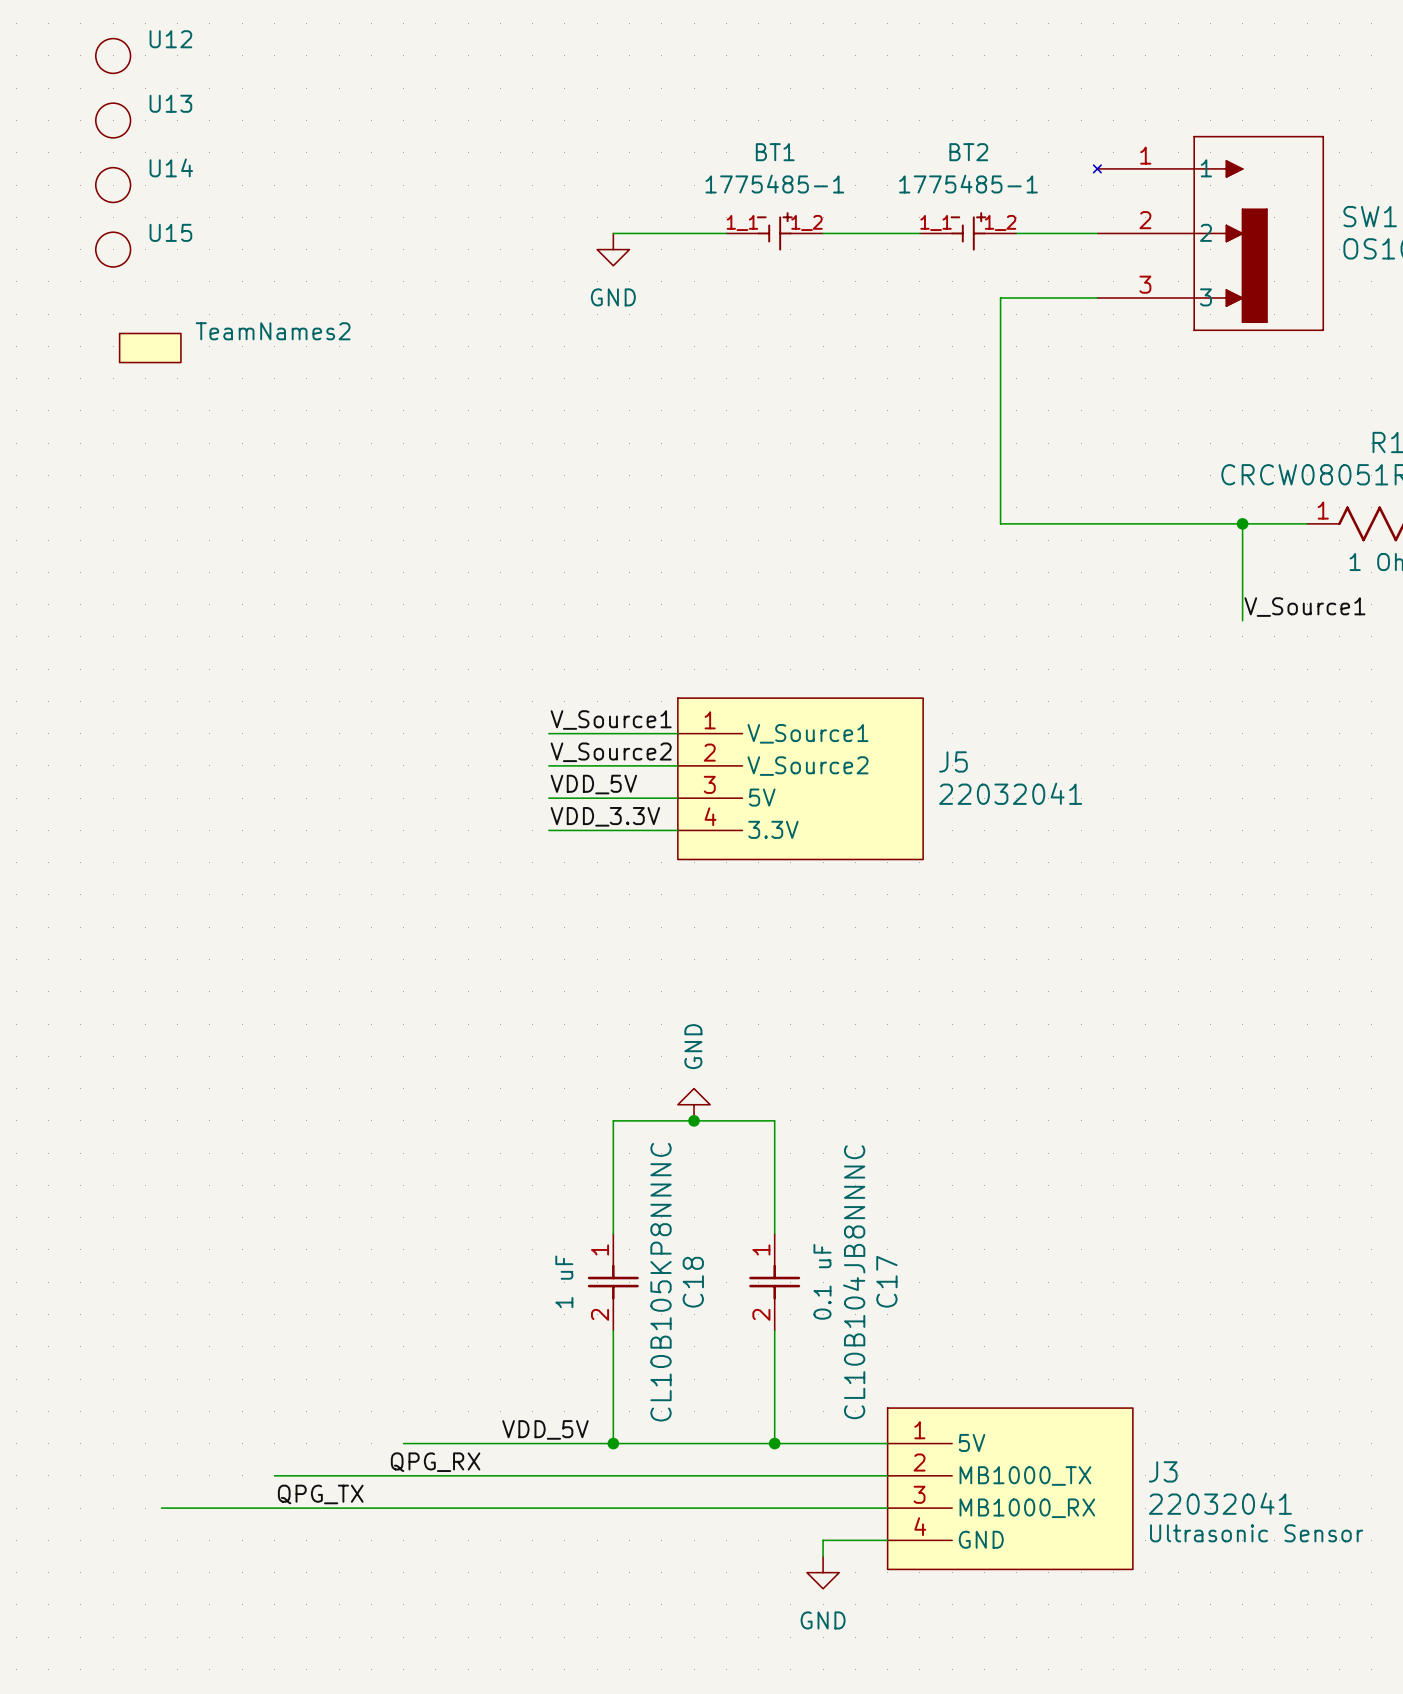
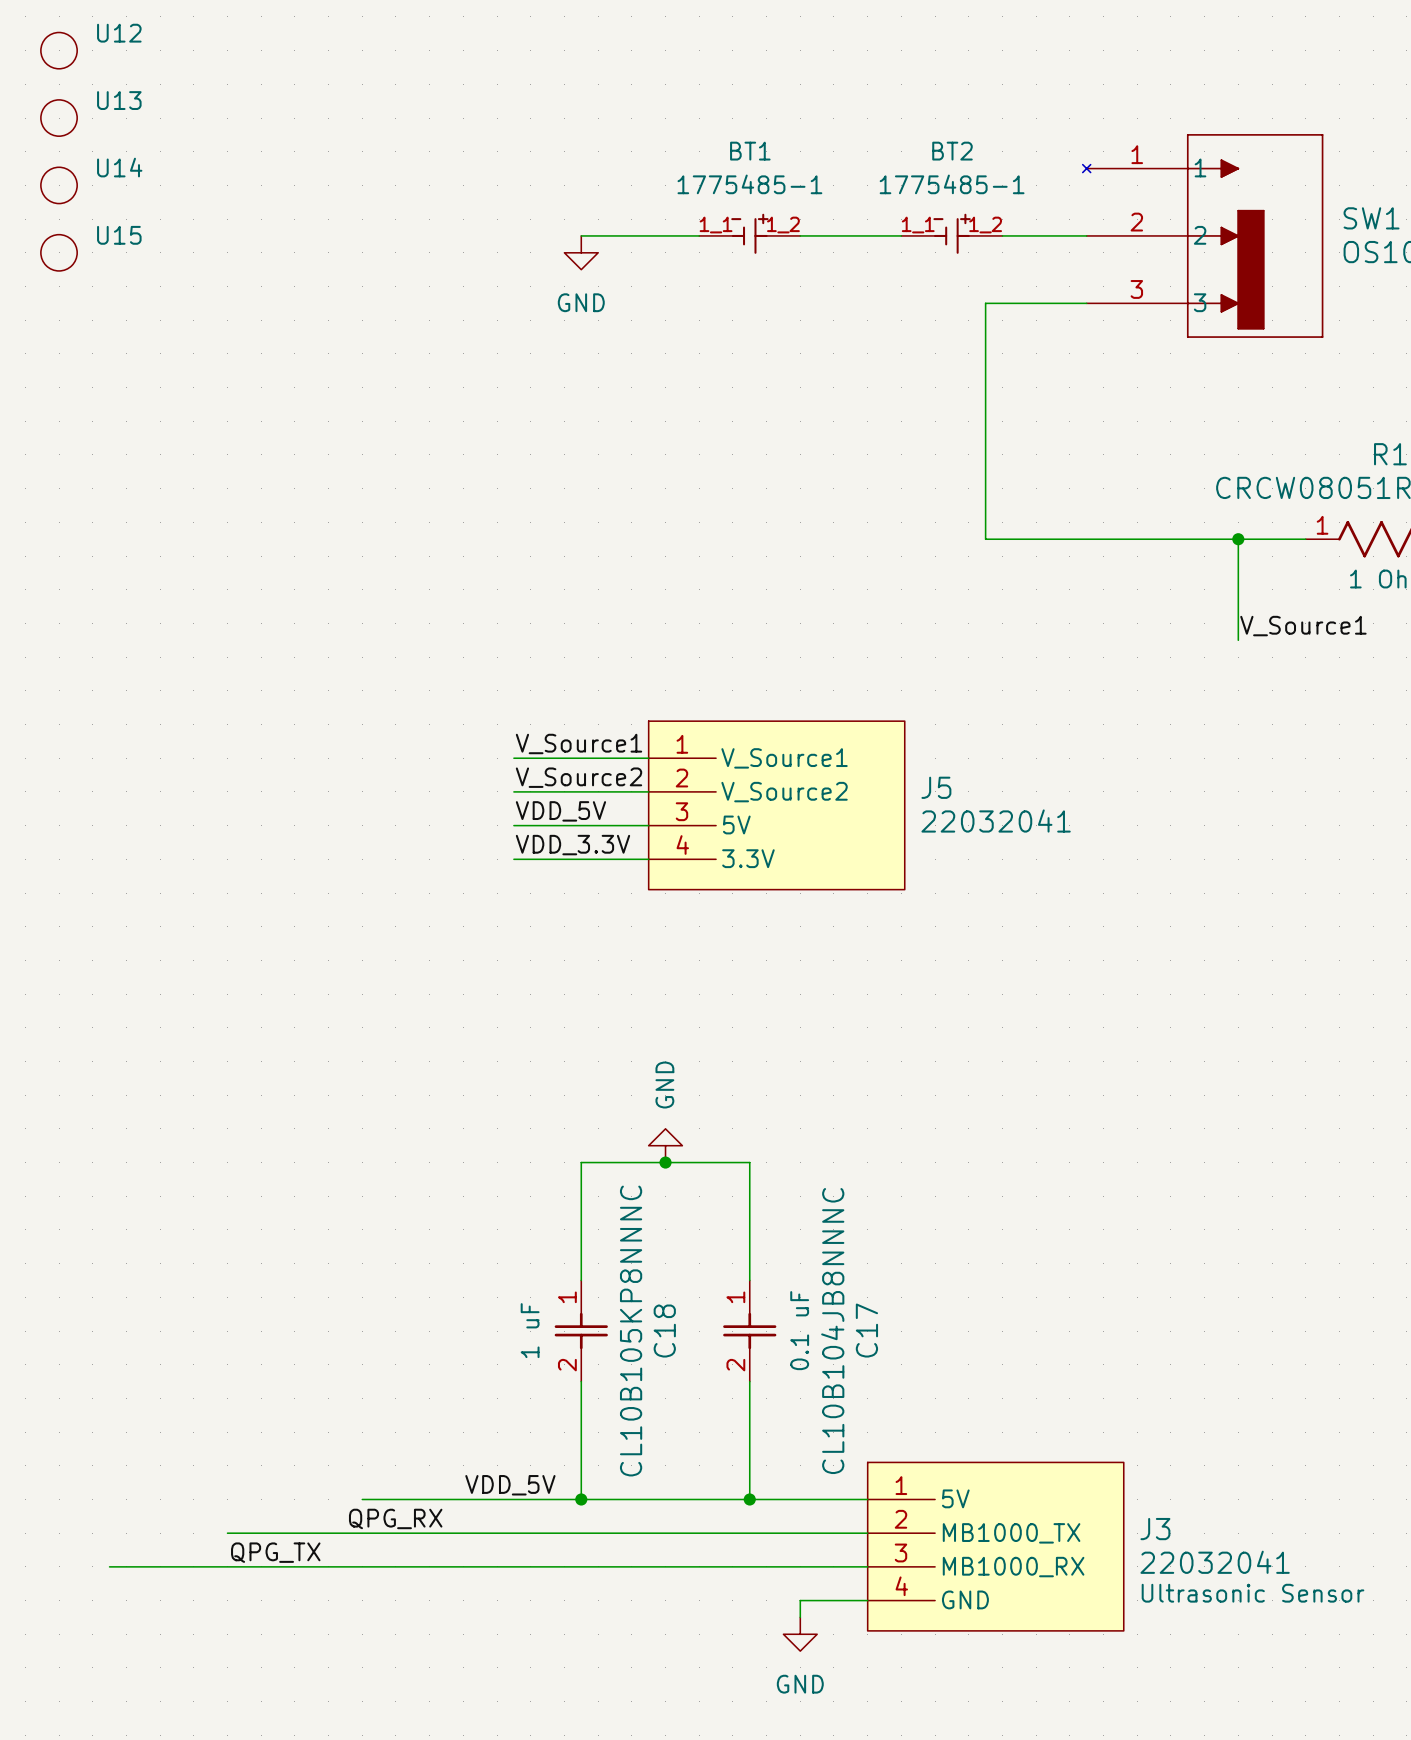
TeamNames2: (150, 348) -> none

